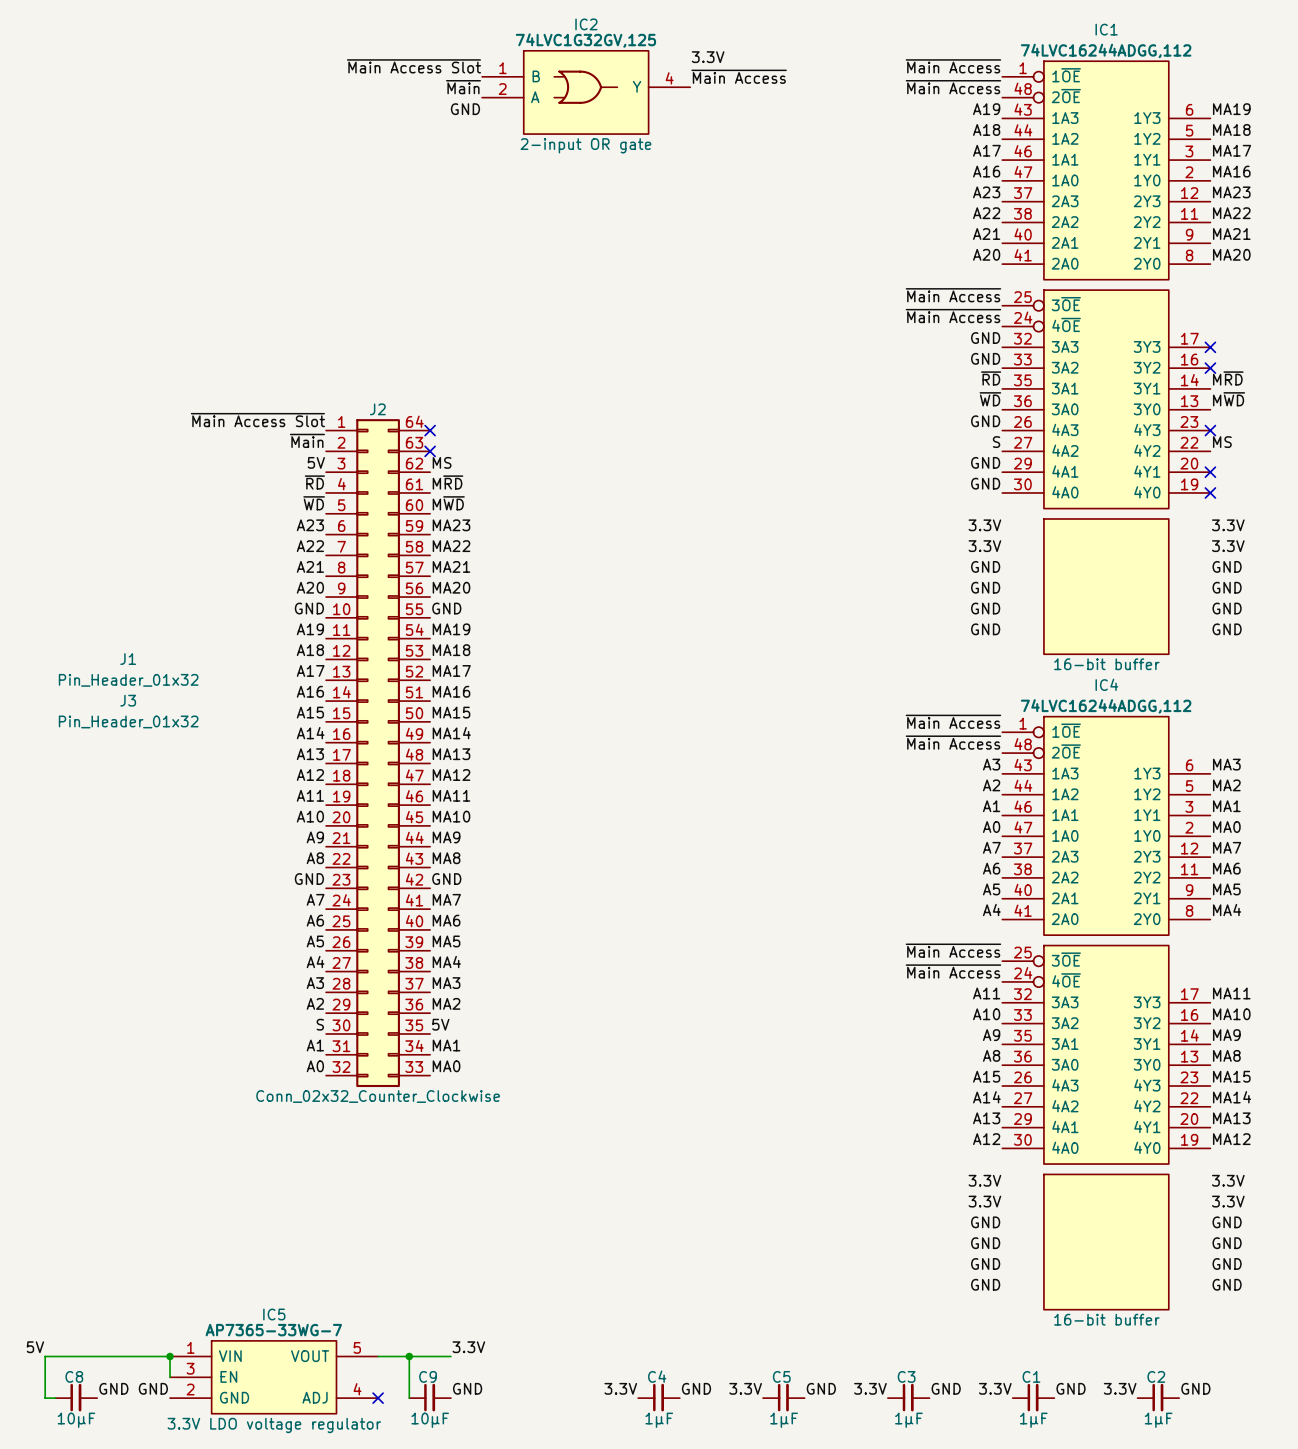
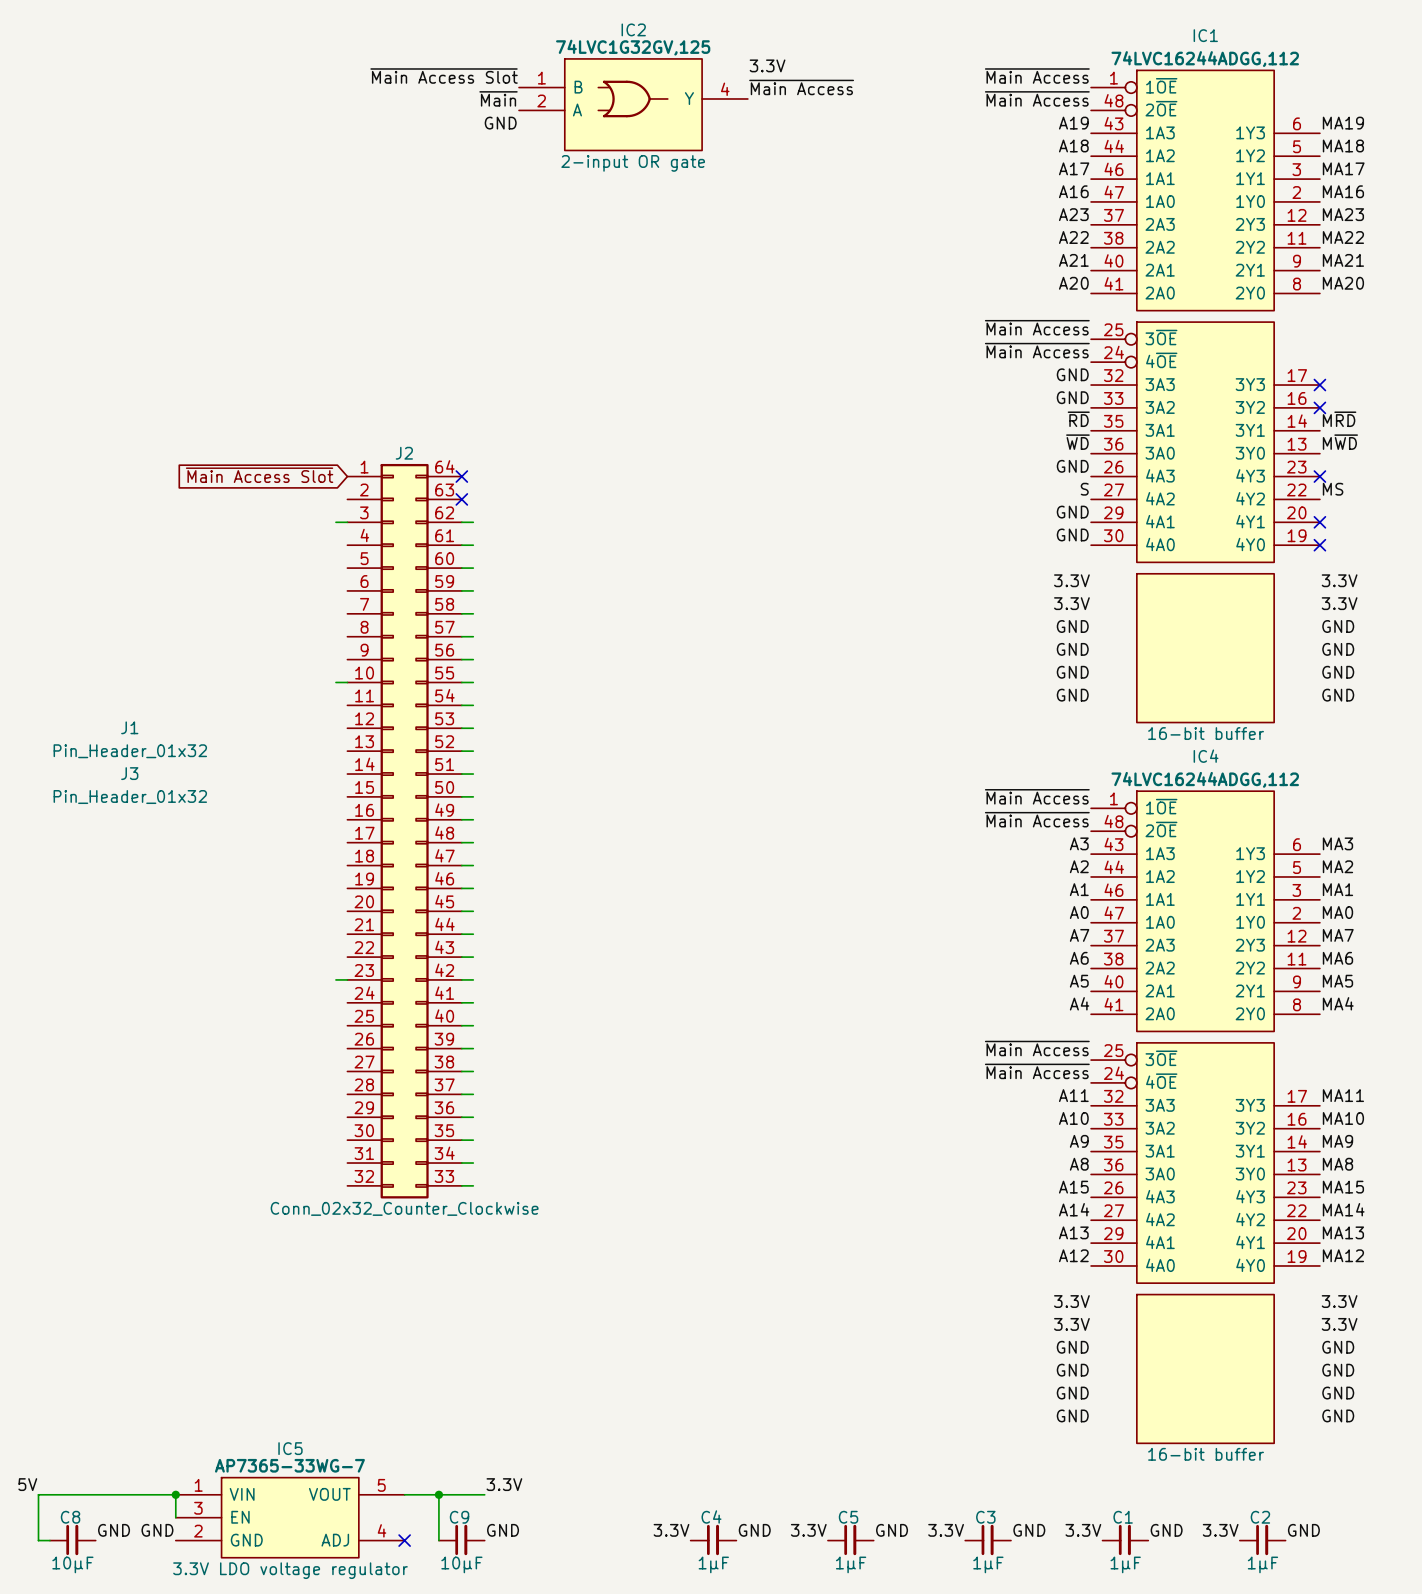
label: ~{Main Access Slot} (257, 420) -> none
global label: none -> ~{Main Access Slot} (259, 475)
label: ~{Main} (307, 440) -> none
label: 5V (316, 462) -> none
label: MS (442, 462) -> none
wire: none -> (335, 522) (347, 522)
wire: none -> (461, 522) (473, 522)
label: ~{RD} (314, 482) -> none
label: M~{RD} (448, 482) -> none
wire: none -> (461, 545) (473, 545)
label: ~{WD} (314, 503) -> none
label: M~{WD} (448, 503) -> none
wire: none -> (461, 568) (473, 568)
label: A23 (310, 525) -> none
label: MA23 (451, 525) -> none
wire: none -> (461, 590) (473, 590)
label: A22 (310, 546) -> none
label: MA22 (451, 546) -> none
wire: none -> (461, 613) (473, 613)
label: A21 (310, 566) -> none
label: MA21 (451, 566) -> none
wire: none -> (461, 636) (473, 636)
label: A20 (310, 587) -> none
label: MA20 (451, 587) -> none
wire: none -> (461, 659) (473, 659)
label: GND (309, 608) -> none
label: GND (446, 608) -> none
wire: none -> (335, 682) (347, 682)
wire: none -> (461, 682) (473, 682)
label: A19 (310, 629) -> none
label: MA19 (451, 629) -> none
wire: none -> (461, 705) (473, 705)
label: A18 (310, 650) -> none
label: MA18 (451, 650) -> none
wire: none -> (461, 728) (473, 728)
label: A17 (310, 670) -> none
label: MA17 (451, 670) -> none
wire: none -> (461, 751) (473, 751)
label: A16 (310, 691) -> none
label: MA16 (451, 691) -> none
wire: none -> (461, 774) (473, 774)
label: A15 (310, 712) -> none
label: MA15 (451, 712) -> none
wire: none -> (461, 796) (473, 796)
label: A14 (310, 733) -> none
label: MA14 (451, 733) -> none
wire: none -> (461, 819) (473, 819)
label: A13 (310, 754) -> none
label: MA13 (451, 754) -> none
wire: none -> (461, 842) (473, 842)
label: A12 (310, 775) -> none
label: MA12 (451, 775) -> none
wire: none -> (461, 865) (473, 865)
label: A11 (310, 795) -> none
label: MA11 (451, 795) -> none
wire: none -> (461, 888) (473, 888)
label: A10 (310, 816) -> none
label: MA10 (451, 816) -> none
wire: none -> (461, 911) (473, 911)
label: A9 (315, 837) -> none
label: MA9 (446, 837) -> none
wire: none -> (461, 934) (473, 934)
label: A8 (315, 858) -> none
label: MA8 (446, 858) -> none
wire: none -> (461, 957) (473, 957)
label: GND (309, 879) -> none
label: GND (446, 879) -> none
wire: none -> (335, 979) (347, 979)
wire: none -> (461, 979) (473, 979)
label: A7 (315, 899) -> none
label: MA7 (446, 899) -> none
wire: none -> (461, 1002) (473, 1002)
label: A6 (315, 920) -> none
label: MA6 (446, 920) -> none
wire: none -> (461, 1025) (473, 1025)
label: A5 (315, 941) -> none
label: MA5 (446, 941) -> none
wire: none -> (461, 1048) (473, 1048)
label: A4 (315, 962) -> none
label: MA4 (446, 962) -> none
wire: none -> (461, 1071) (473, 1071)
label: A3 (315, 983) -> none
label: MA3 (446, 983) -> none
wire: none -> (461, 1094) (473, 1094)
label: A2 (315, 1003) -> none
label: MA2 (446, 1003) -> none
wire: none -> (461, 1117) (473, 1117)
label: S (320, 1024) -> none
label: 5V (440, 1024) -> none
wire: none -> (461, 1140) (473, 1140)
label: A1 (315, 1045) -> none
label: MA1 (446, 1045) -> none
wire: none -> (461, 1163) (473, 1163)
label: A0 (315, 1066) -> none
label: MA0 (446, 1066) -> none
wire: none -> (461, 1185) (473, 1185)

